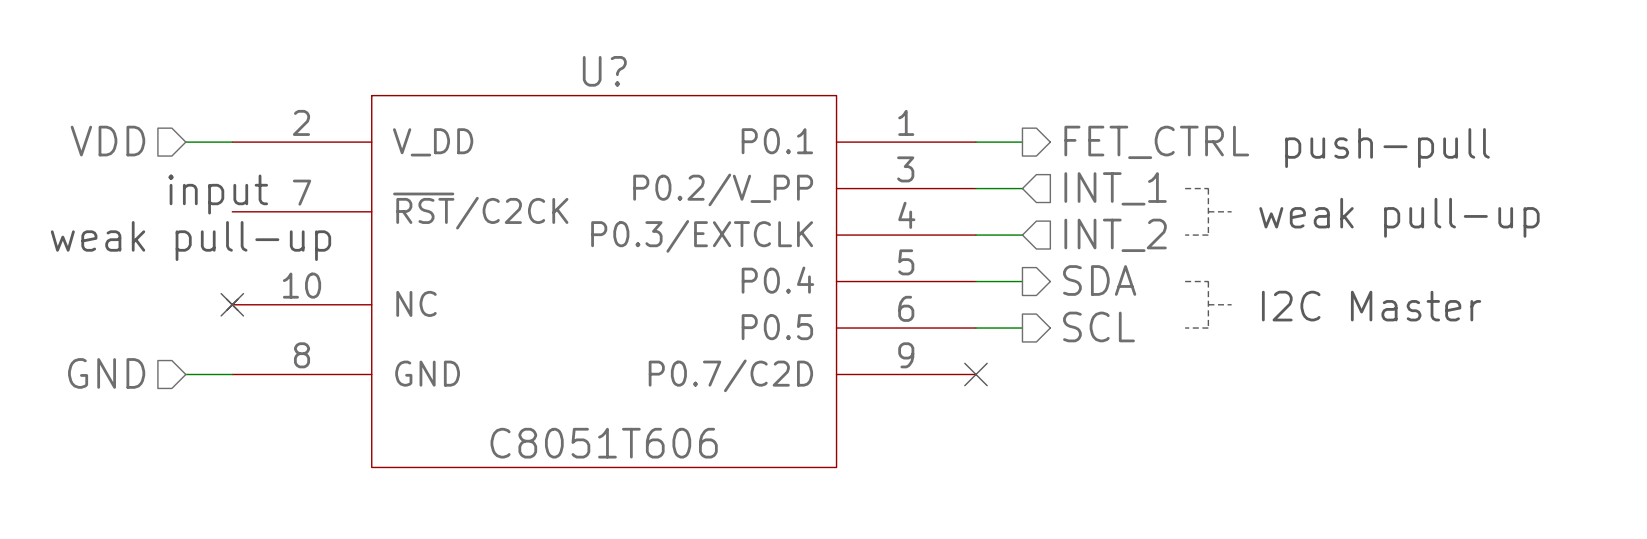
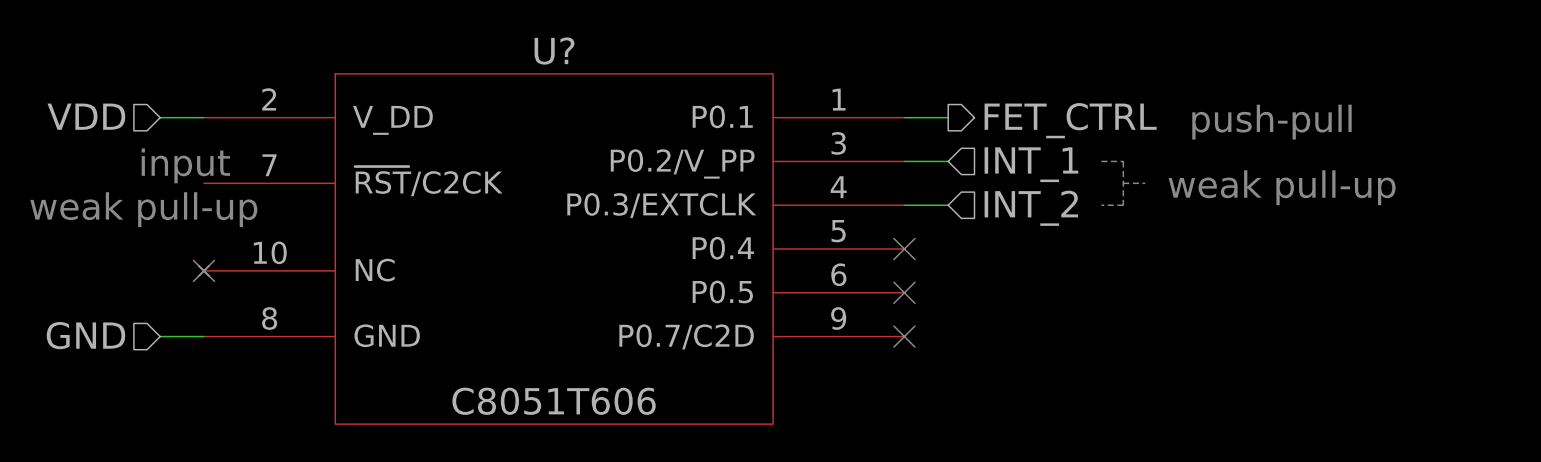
hierarchical label: SDA (1099, 280) -> none
wire: (975, 281) (1022, 281) -> none
no-connect mark: none -> (904, 249)
line: (1185, 281) (1208, 281) (1208, 328) (1185, 328) -> none
line: (1208, 304) (1231, 304) -> none
text: I2C Master (1371, 306) -> none
hierarchical label: SCL (1098, 326) -> none
wire: (975, 328) (1022, 328) -> none
no-connect mark: none -> (904, 292)

